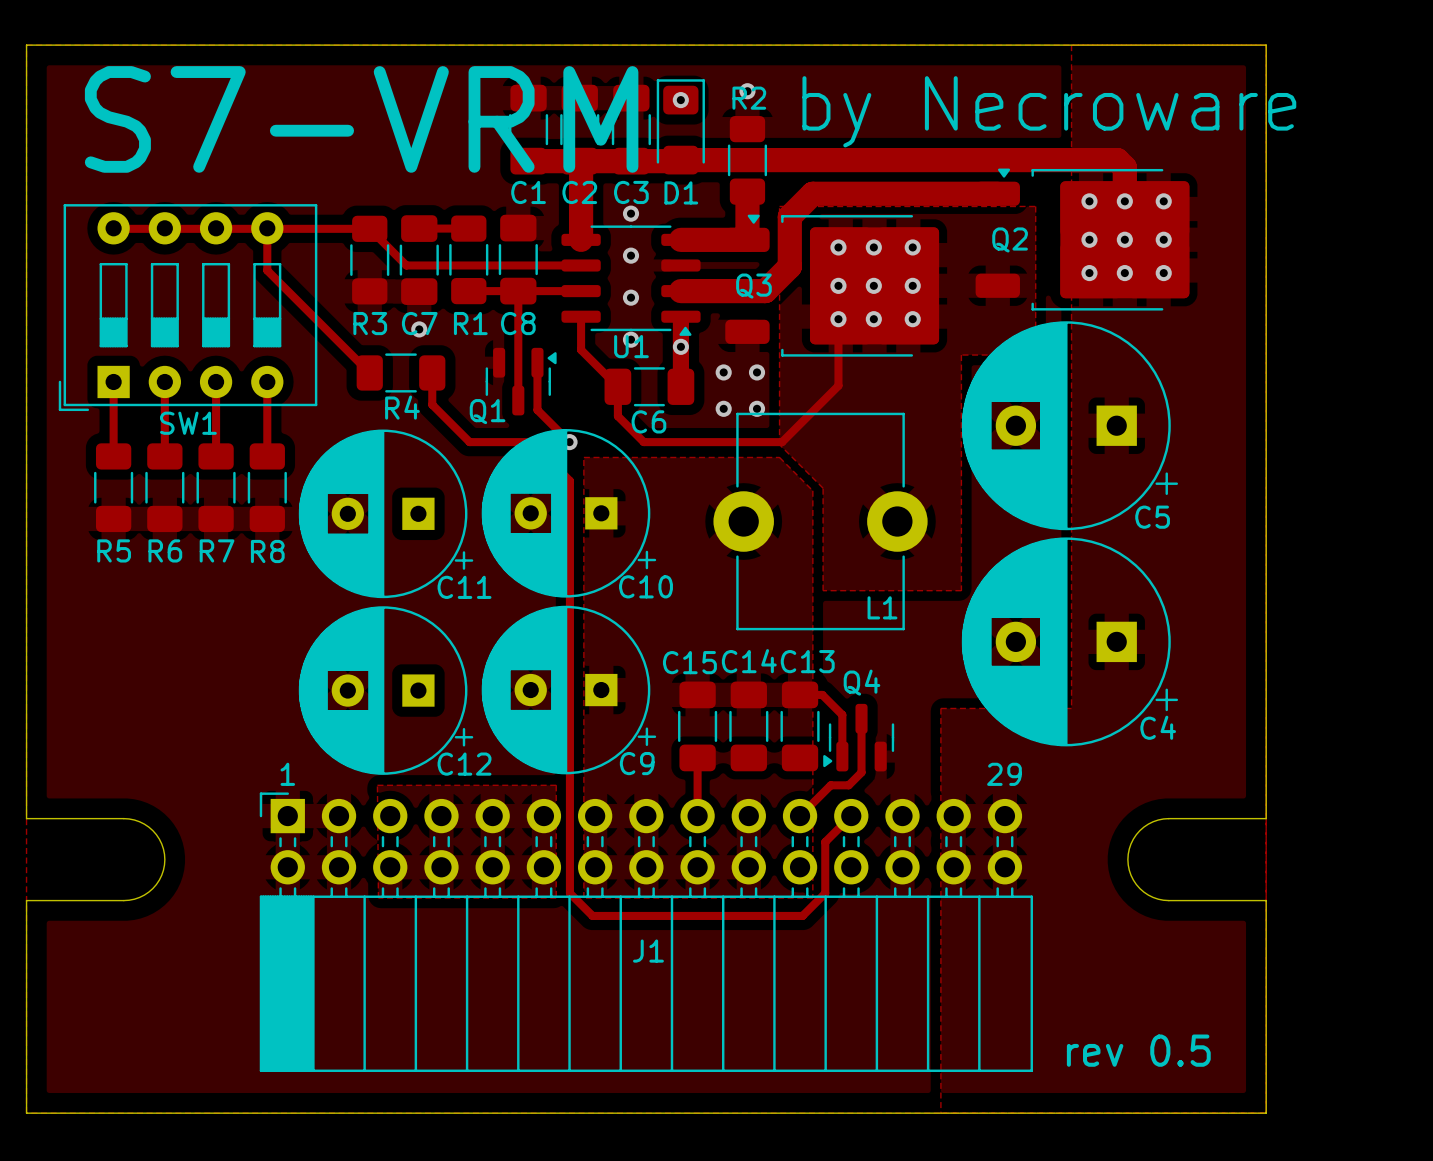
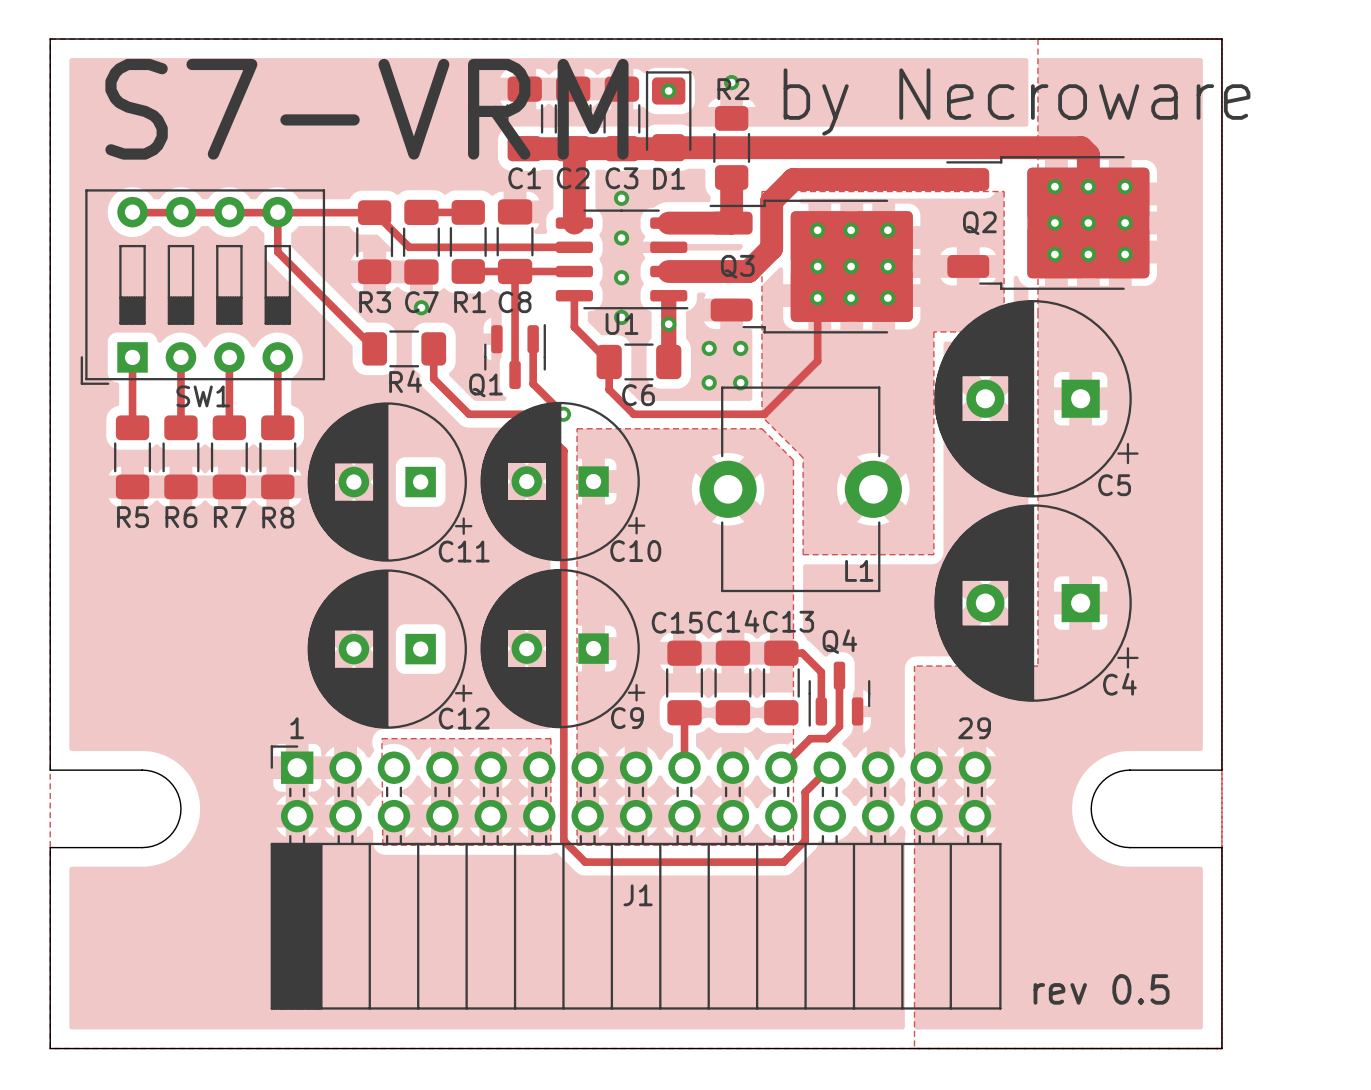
Q2 footprint: [975, 168, 1190, 311] -> [946, 156, 1150, 290]
Q3 footprint: [725, 214, 940, 357] -> [709, 199, 913, 334]
U1 footprint: [561, 225, 701, 336] -> [555, 209, 689, 310]
Q1 footprint: [485, 347, 557, 416] -> [484, 324, 546, 390]
Q4 footprint: [823, 703, 895, 772] -> [808, 661, 871, 727]

